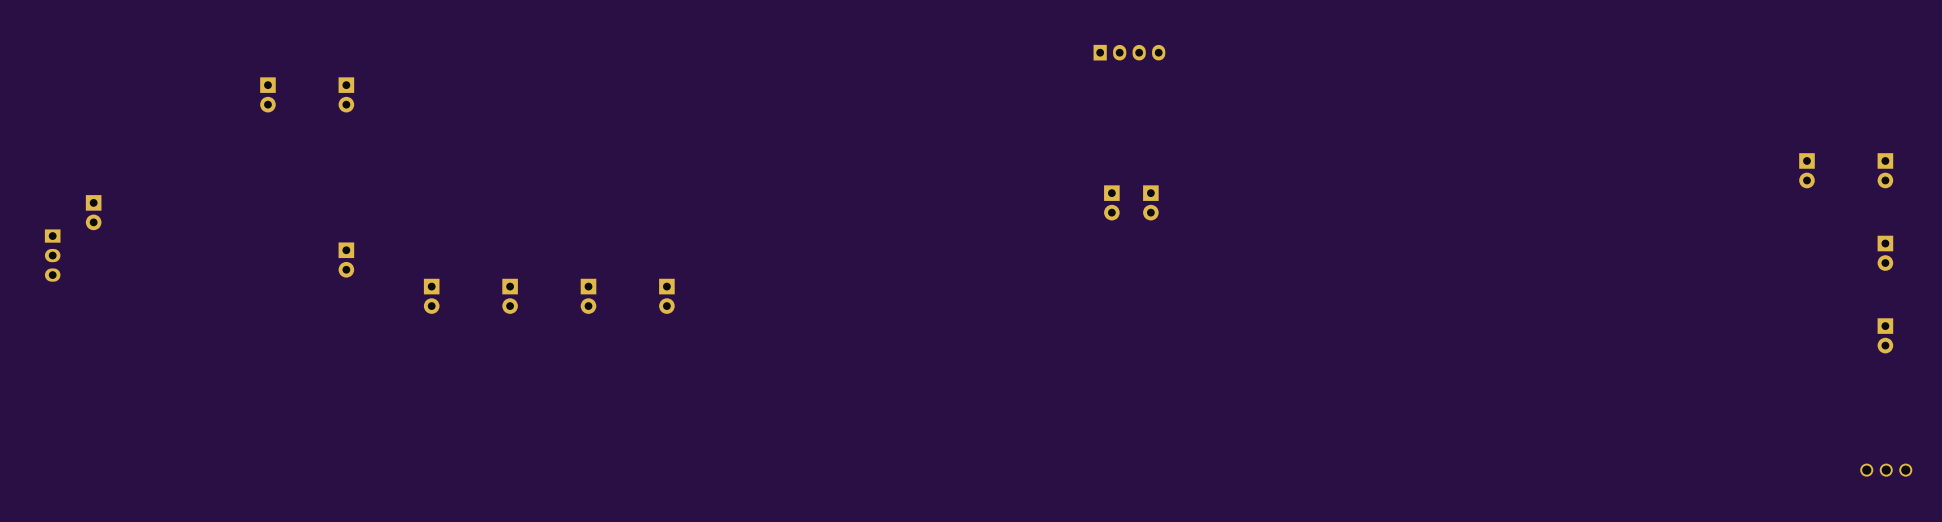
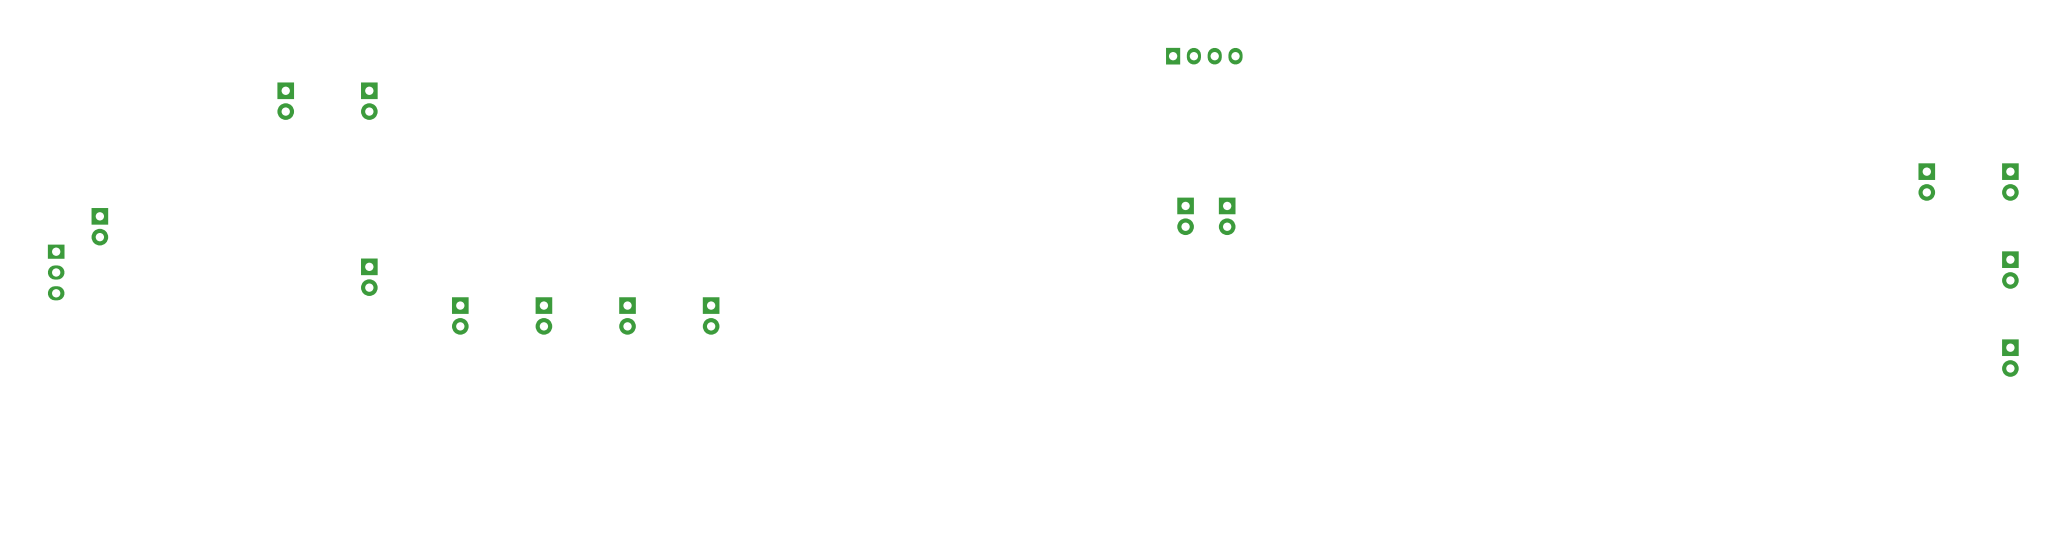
part: (1886, 470) -> none

